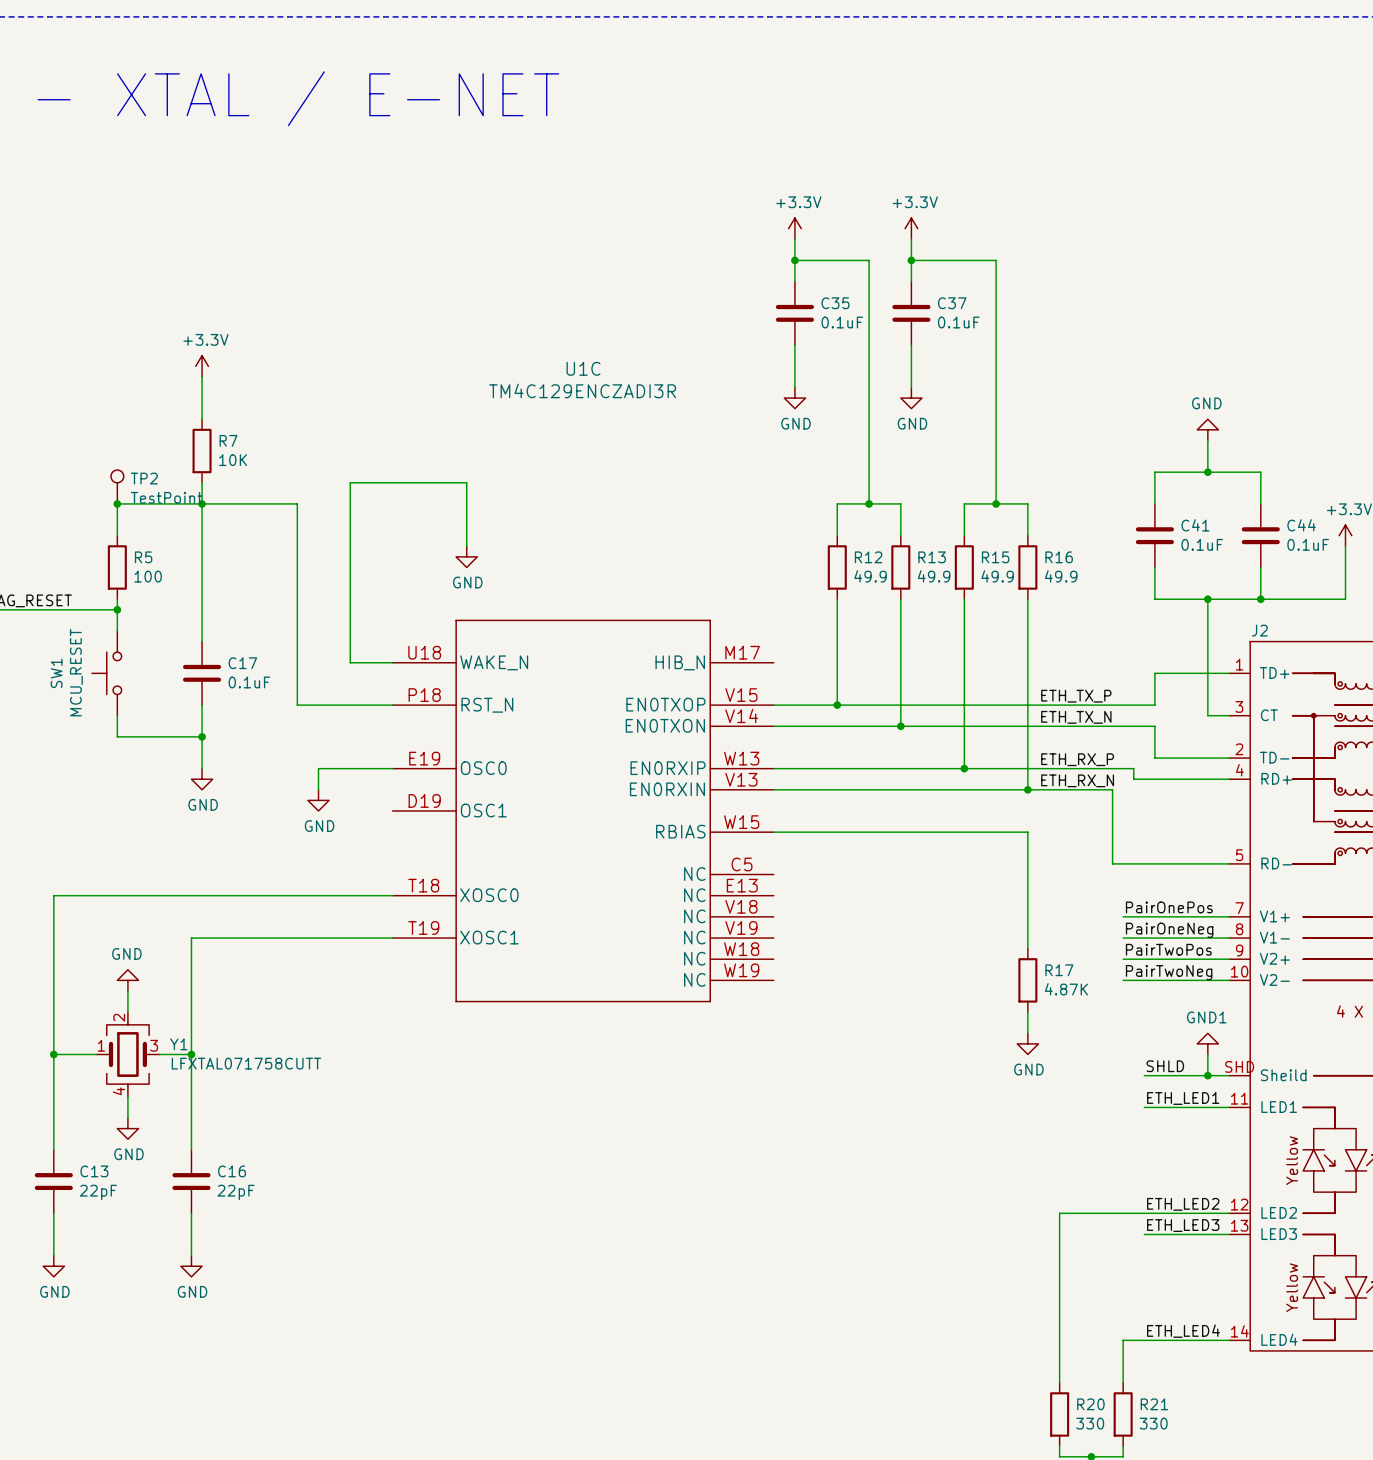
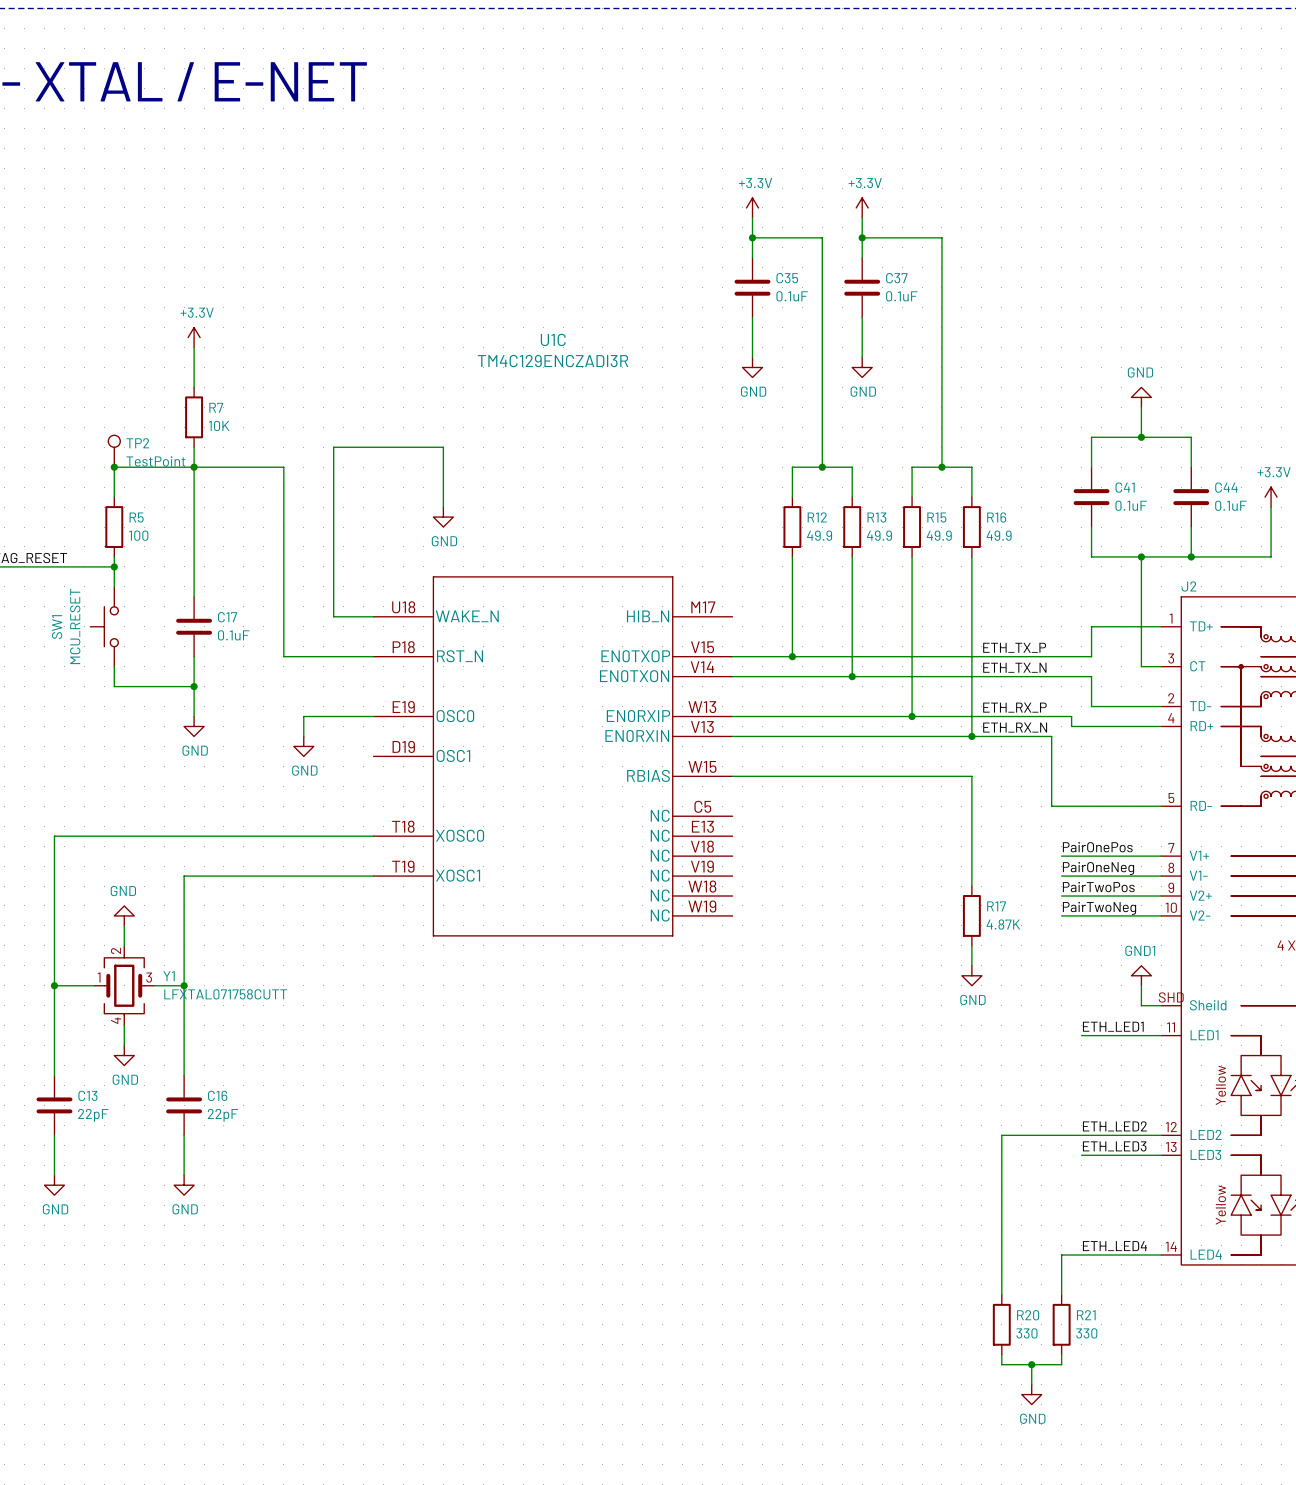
label: SHLD (1165, 1066) -> none
wire: (1144, 1075) (1207, 1075) -> none
junction: (1207, 1075) -> none

